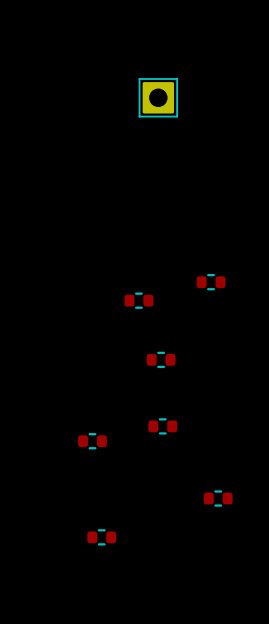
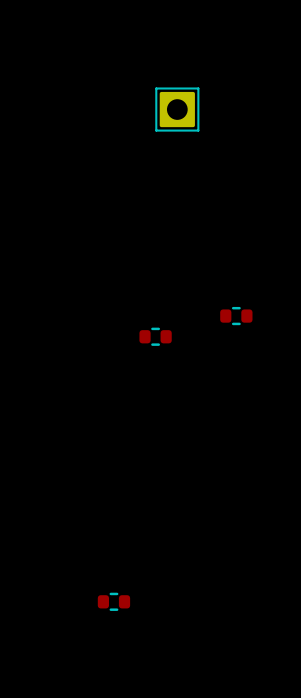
part: (161, 359) -> none
part: (162, 426) -> none
part: (92, 441) -> none
part: (218, 498) -> none

